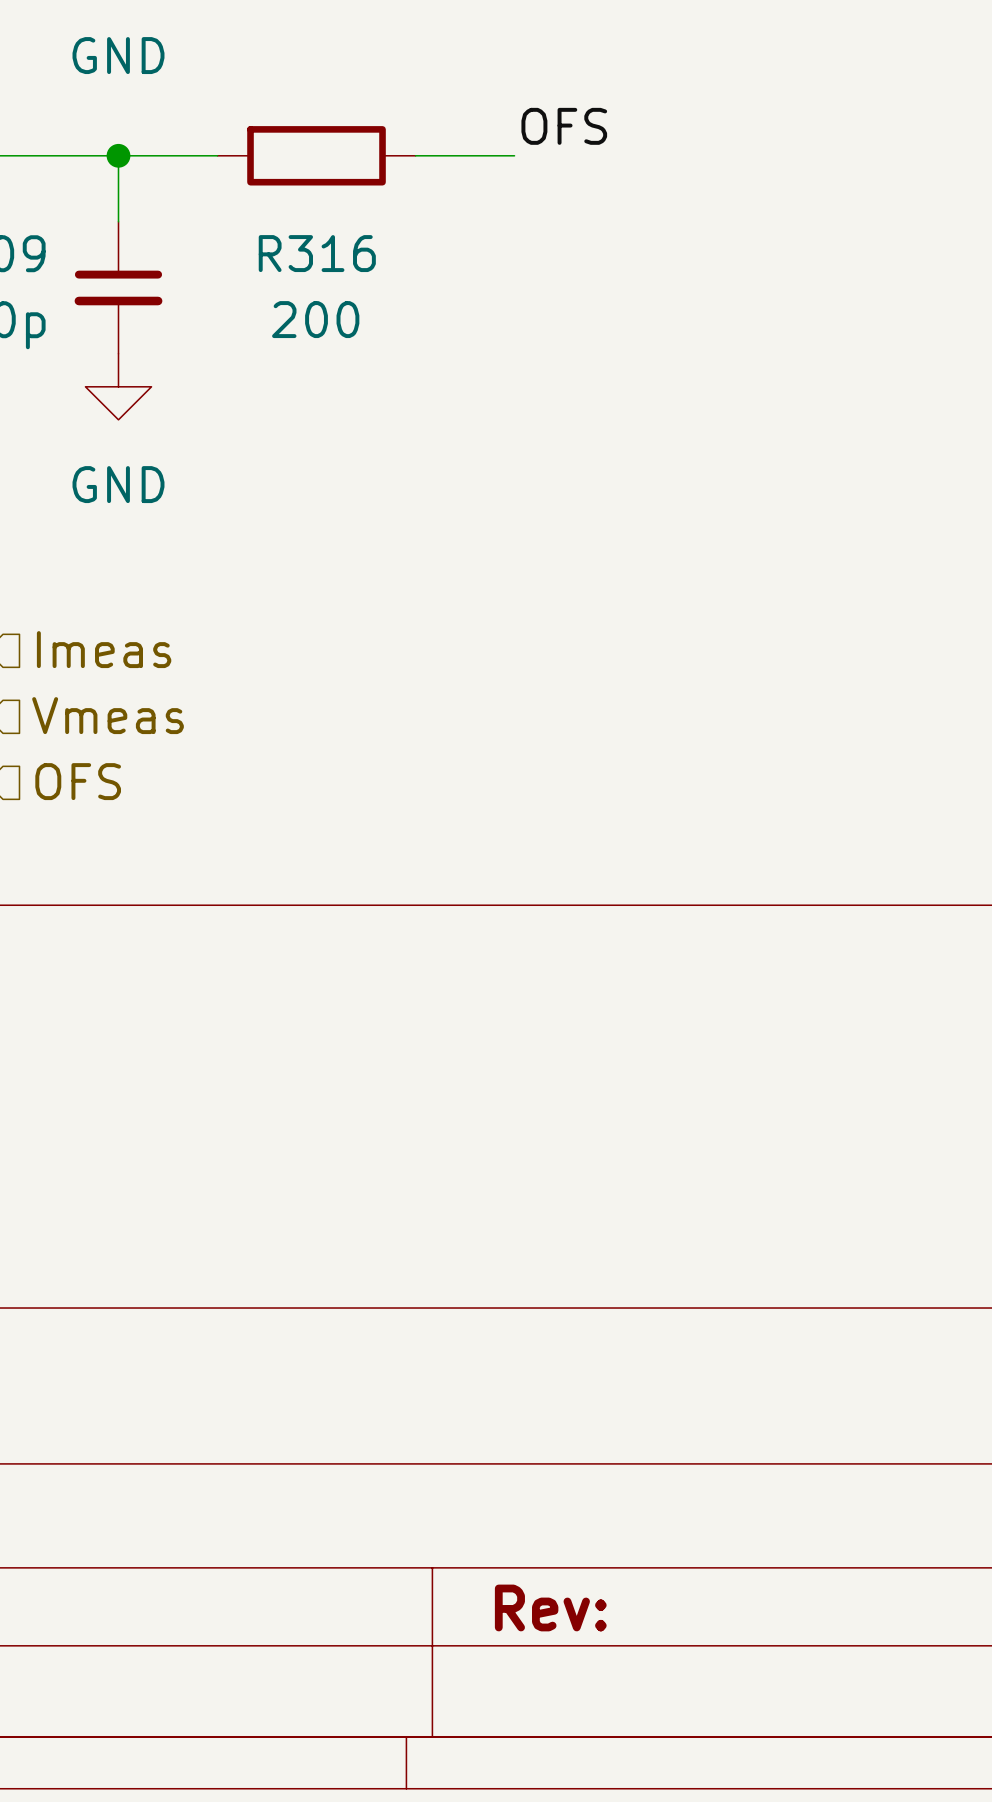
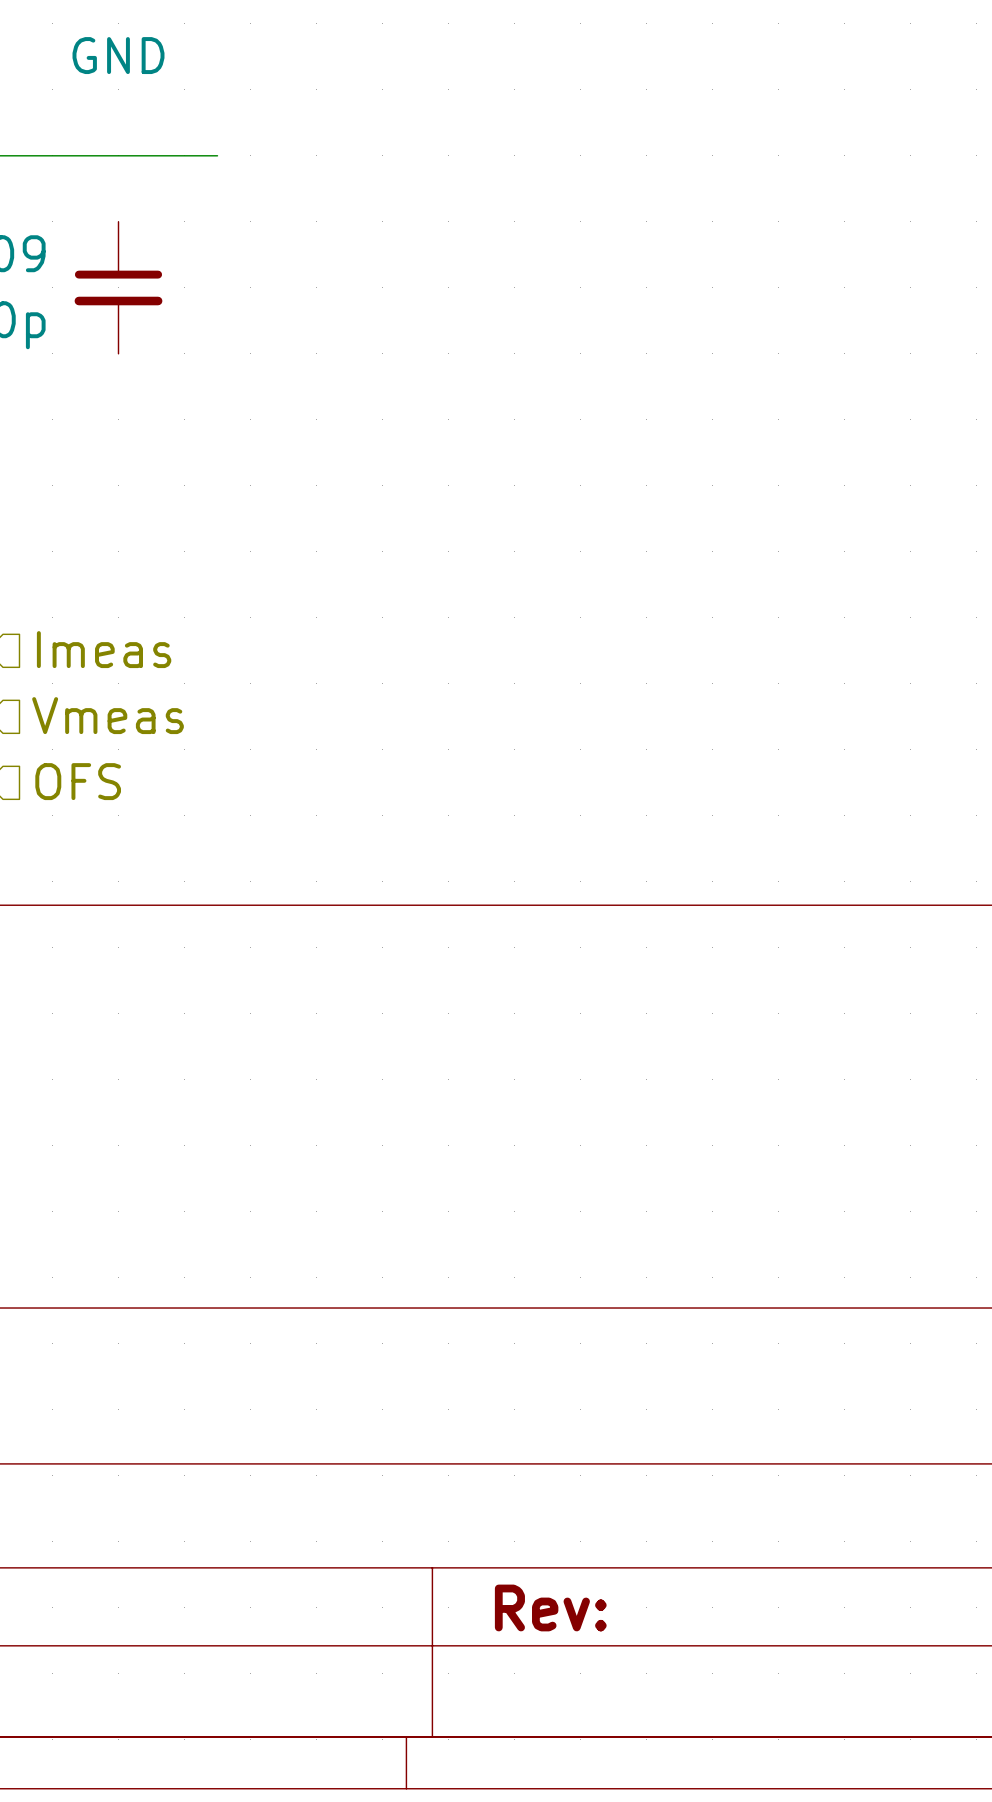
label: OFS (564, 126) -> none
wire: (118, 155) (118, 221) -> none
junction: (118, 155) -> none
R316: 200 (316, 155) -> none
wire: (415, 155) (514, 155) -> none
power symbol: GND (118, 386) -> none

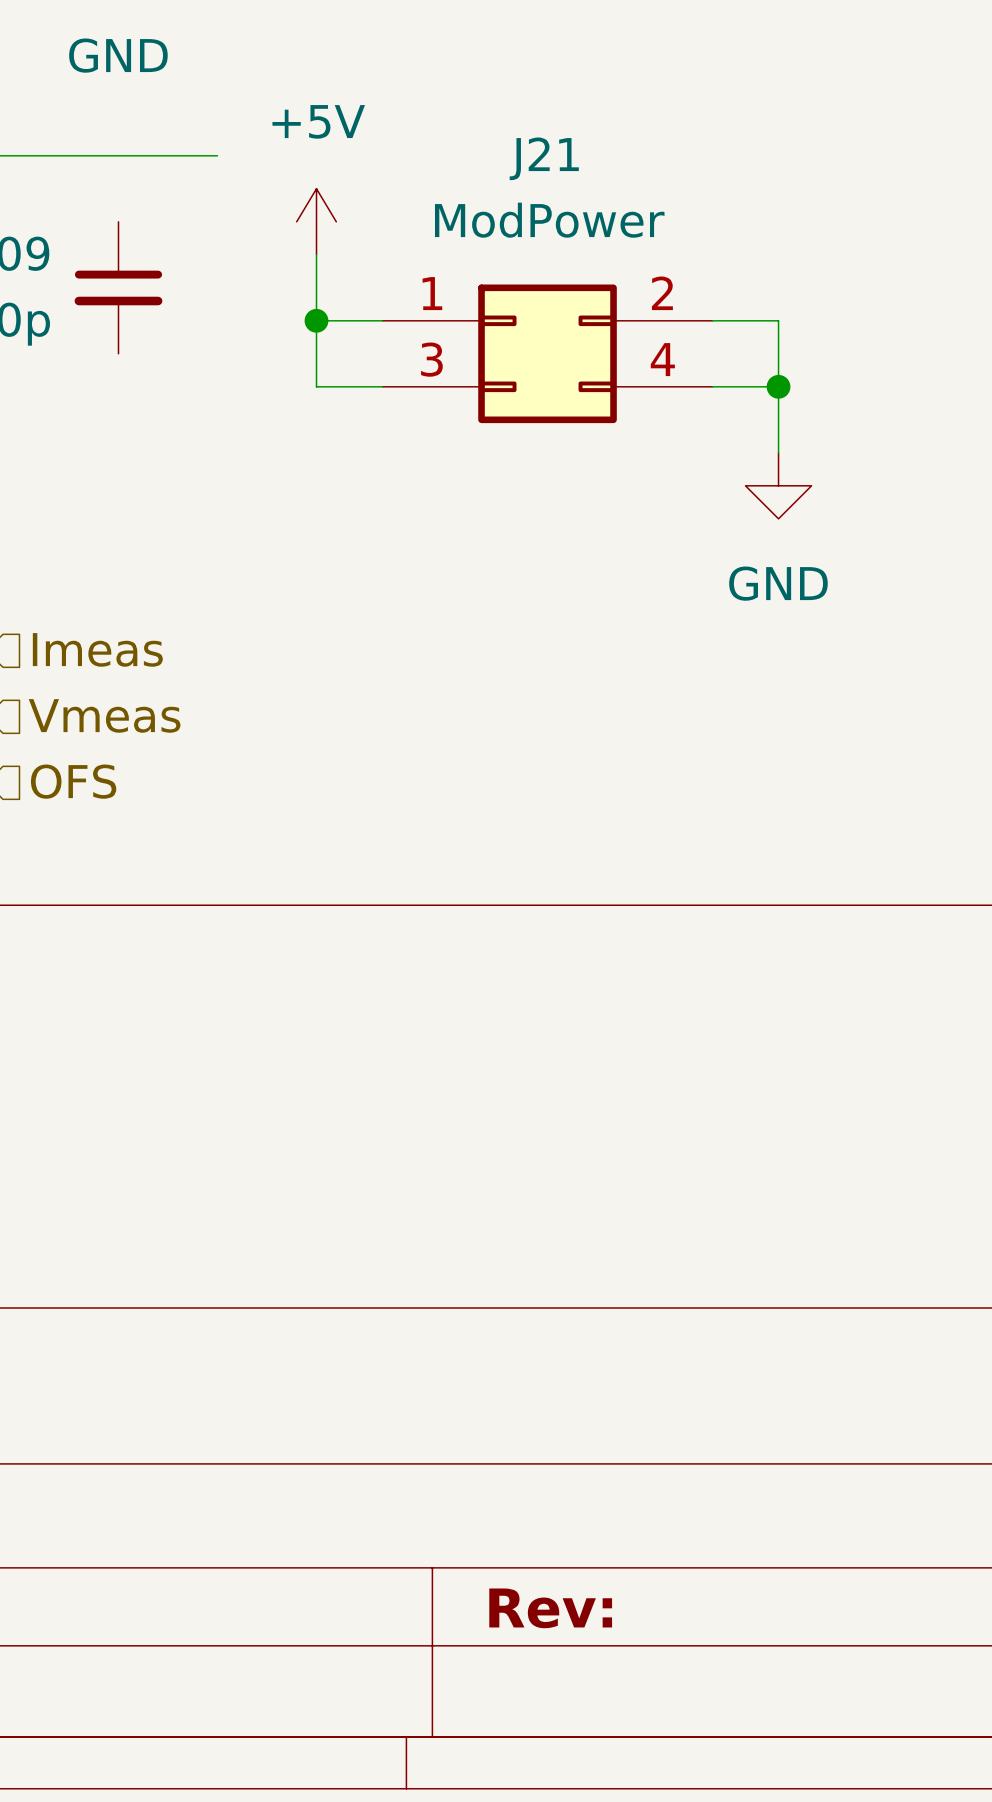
power symbol: none -> +5V (316, 221)
wire: none -> (316, 254) (316, 386) (382, 386)
wire: none -> (316, 320) (382, 320)
junction: none -> (316, 320)
wire: none -> (712, 320) (778, 320) (778, 452)
J21: none -> ModPower (547, 353)
wire: none -> (712, 386) (778, 386)
junction: none -> (778, 386)
power symbol: none -> GND (778, 485)

